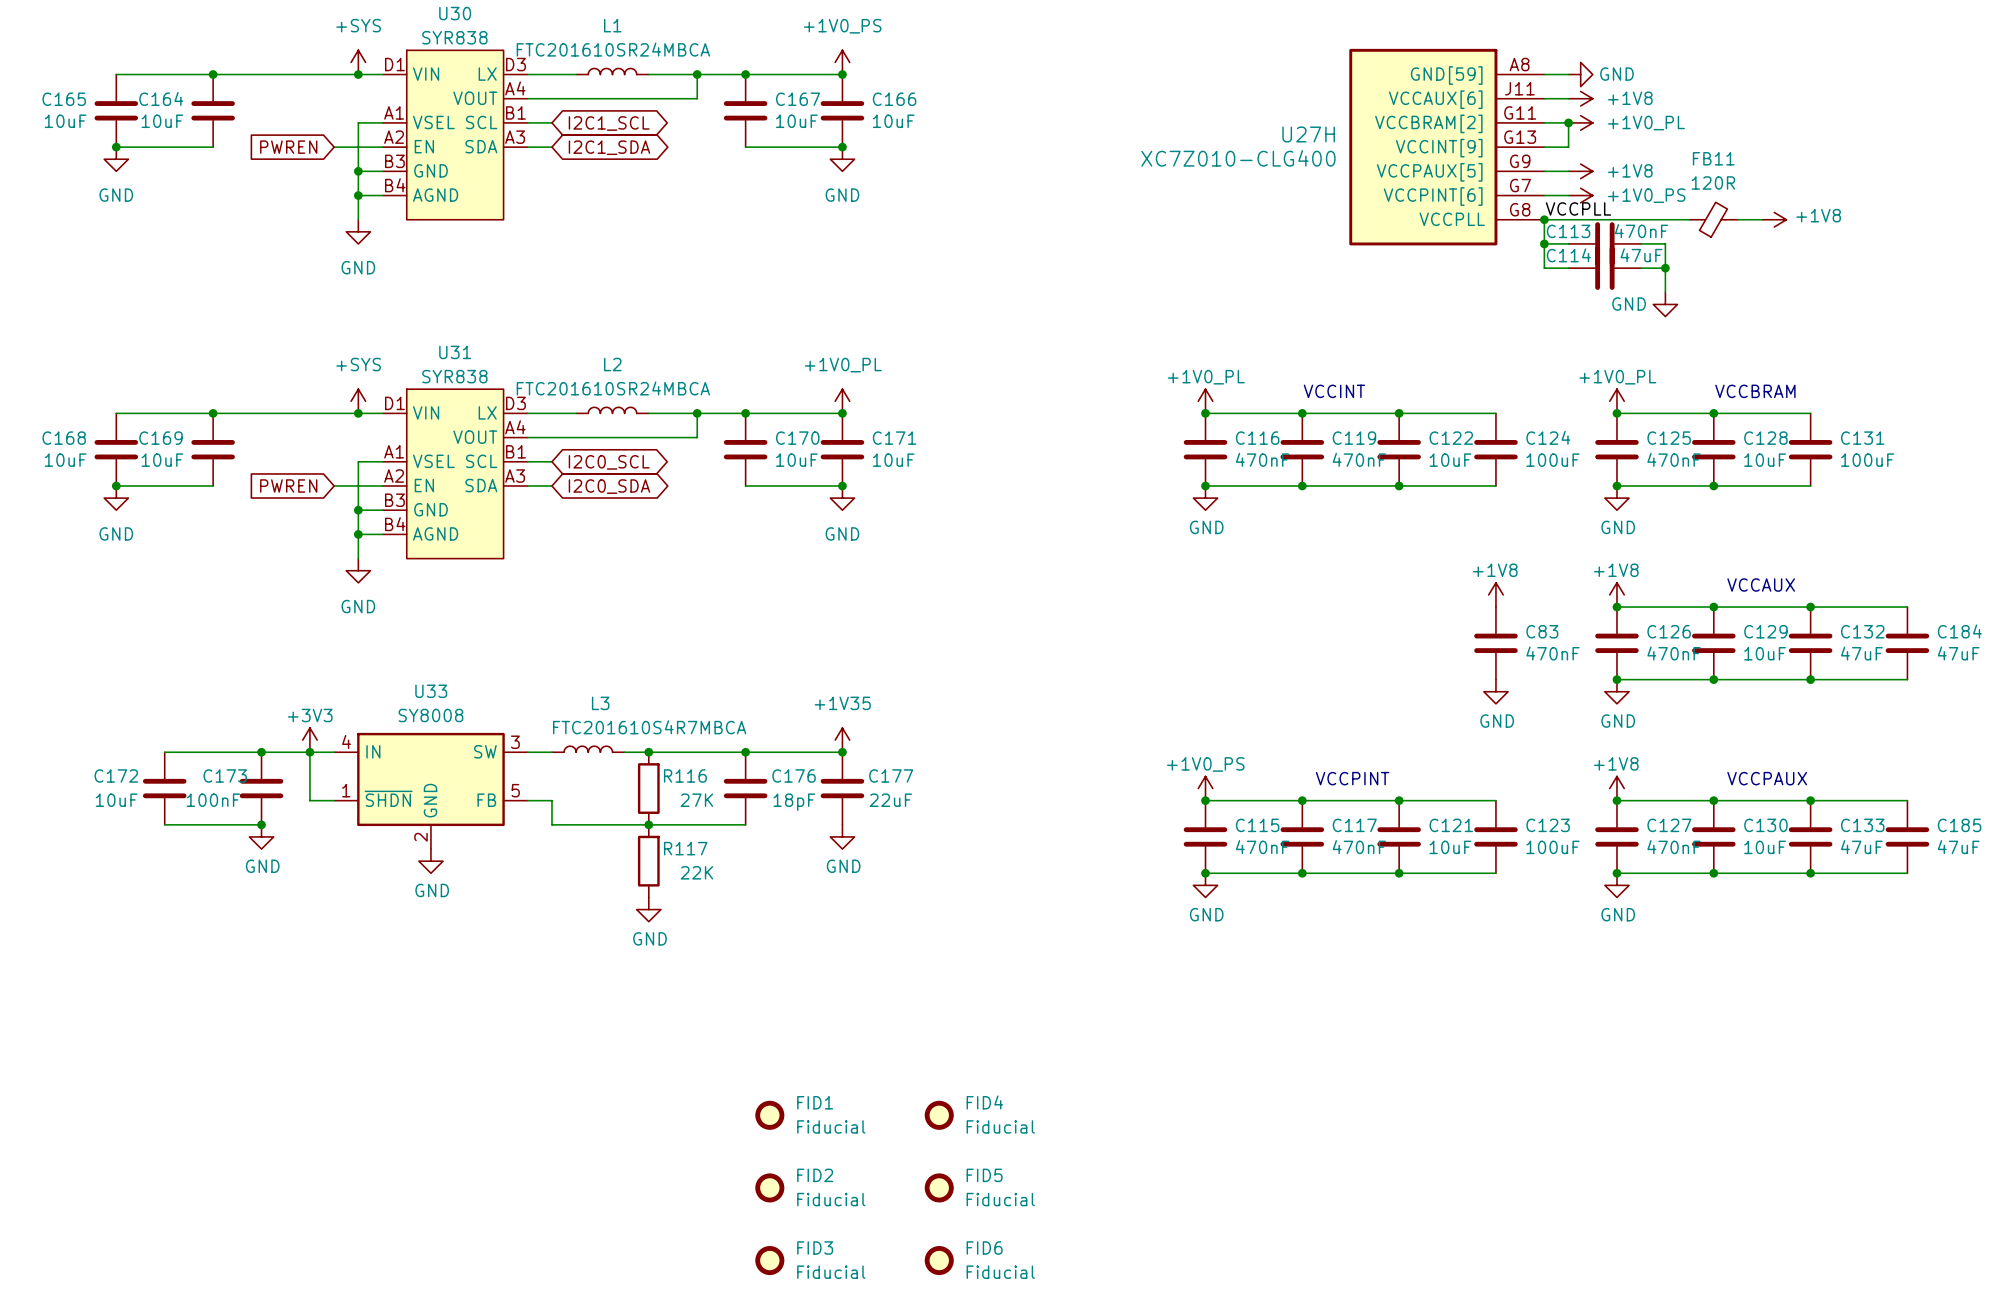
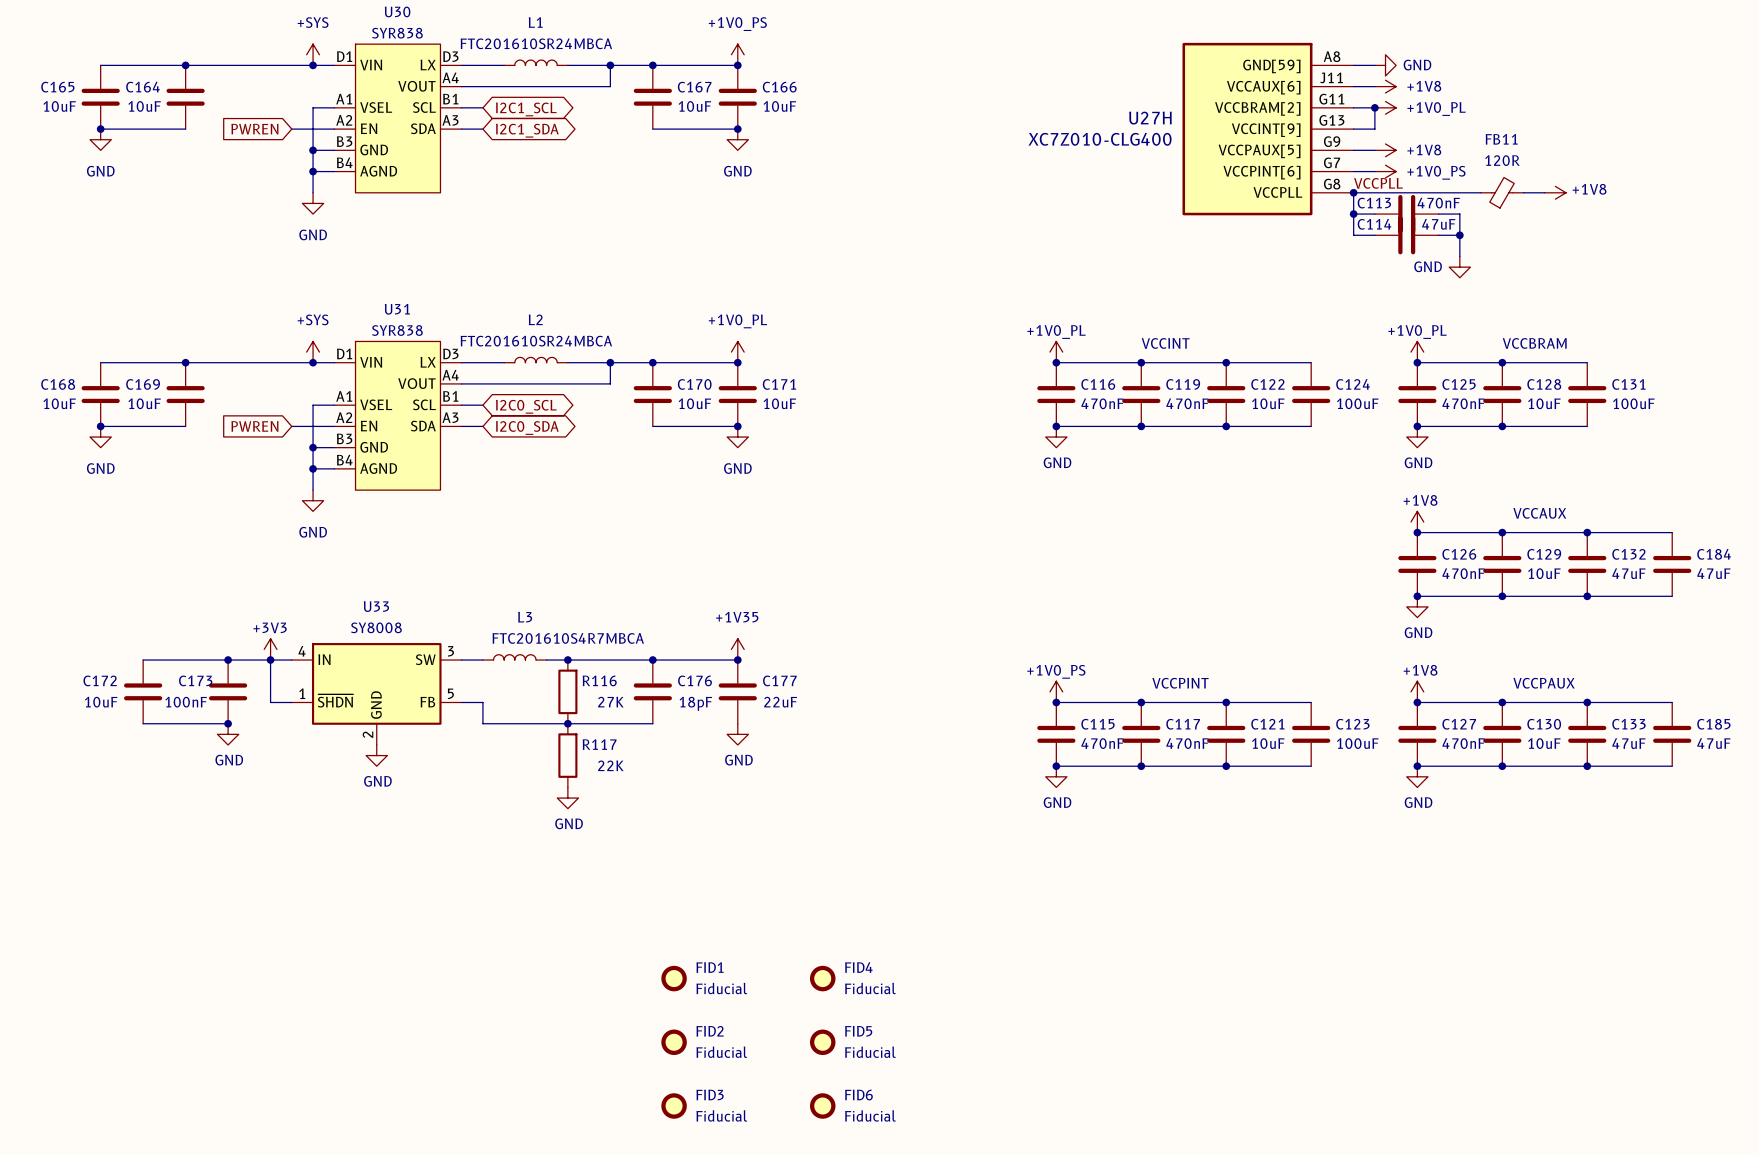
power symbol: +1V8 (1495, 594) -> none
C83: 470nF (1495, 643) -> none
power symbol: GND (1495, 691) -> none

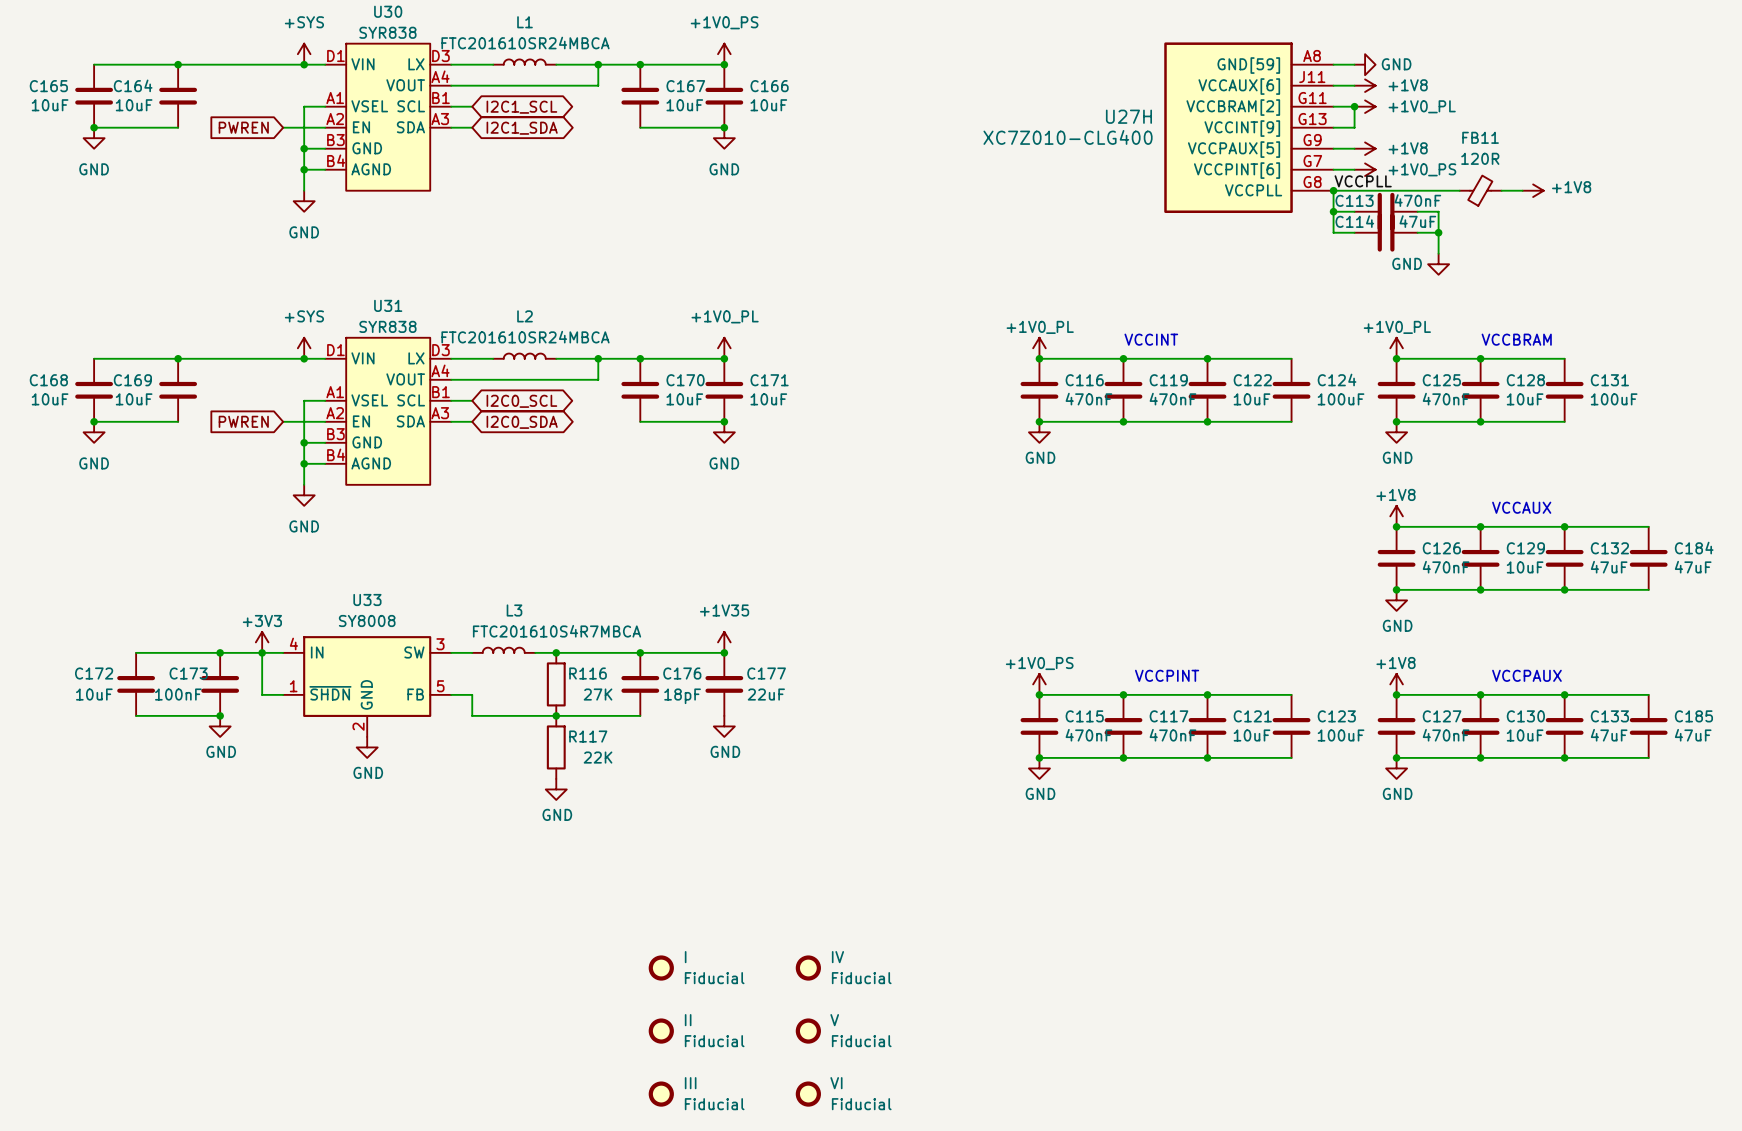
FID1 name: FID1 (710, 967) -> I (685, 957)
FID4 name: FID4 (858, 967) -> IV (837, 957)
FID2 name: FID2 (710, 1031) -> II (688, 1020)
FID5 name: FID5 (858, 1031) -> V (834, 1020)
FID3 name: FID3 (710, 1094) -> III (690, 1083)
FID6 name: FID6 (858, 1095) -> VI (836, 1083)

